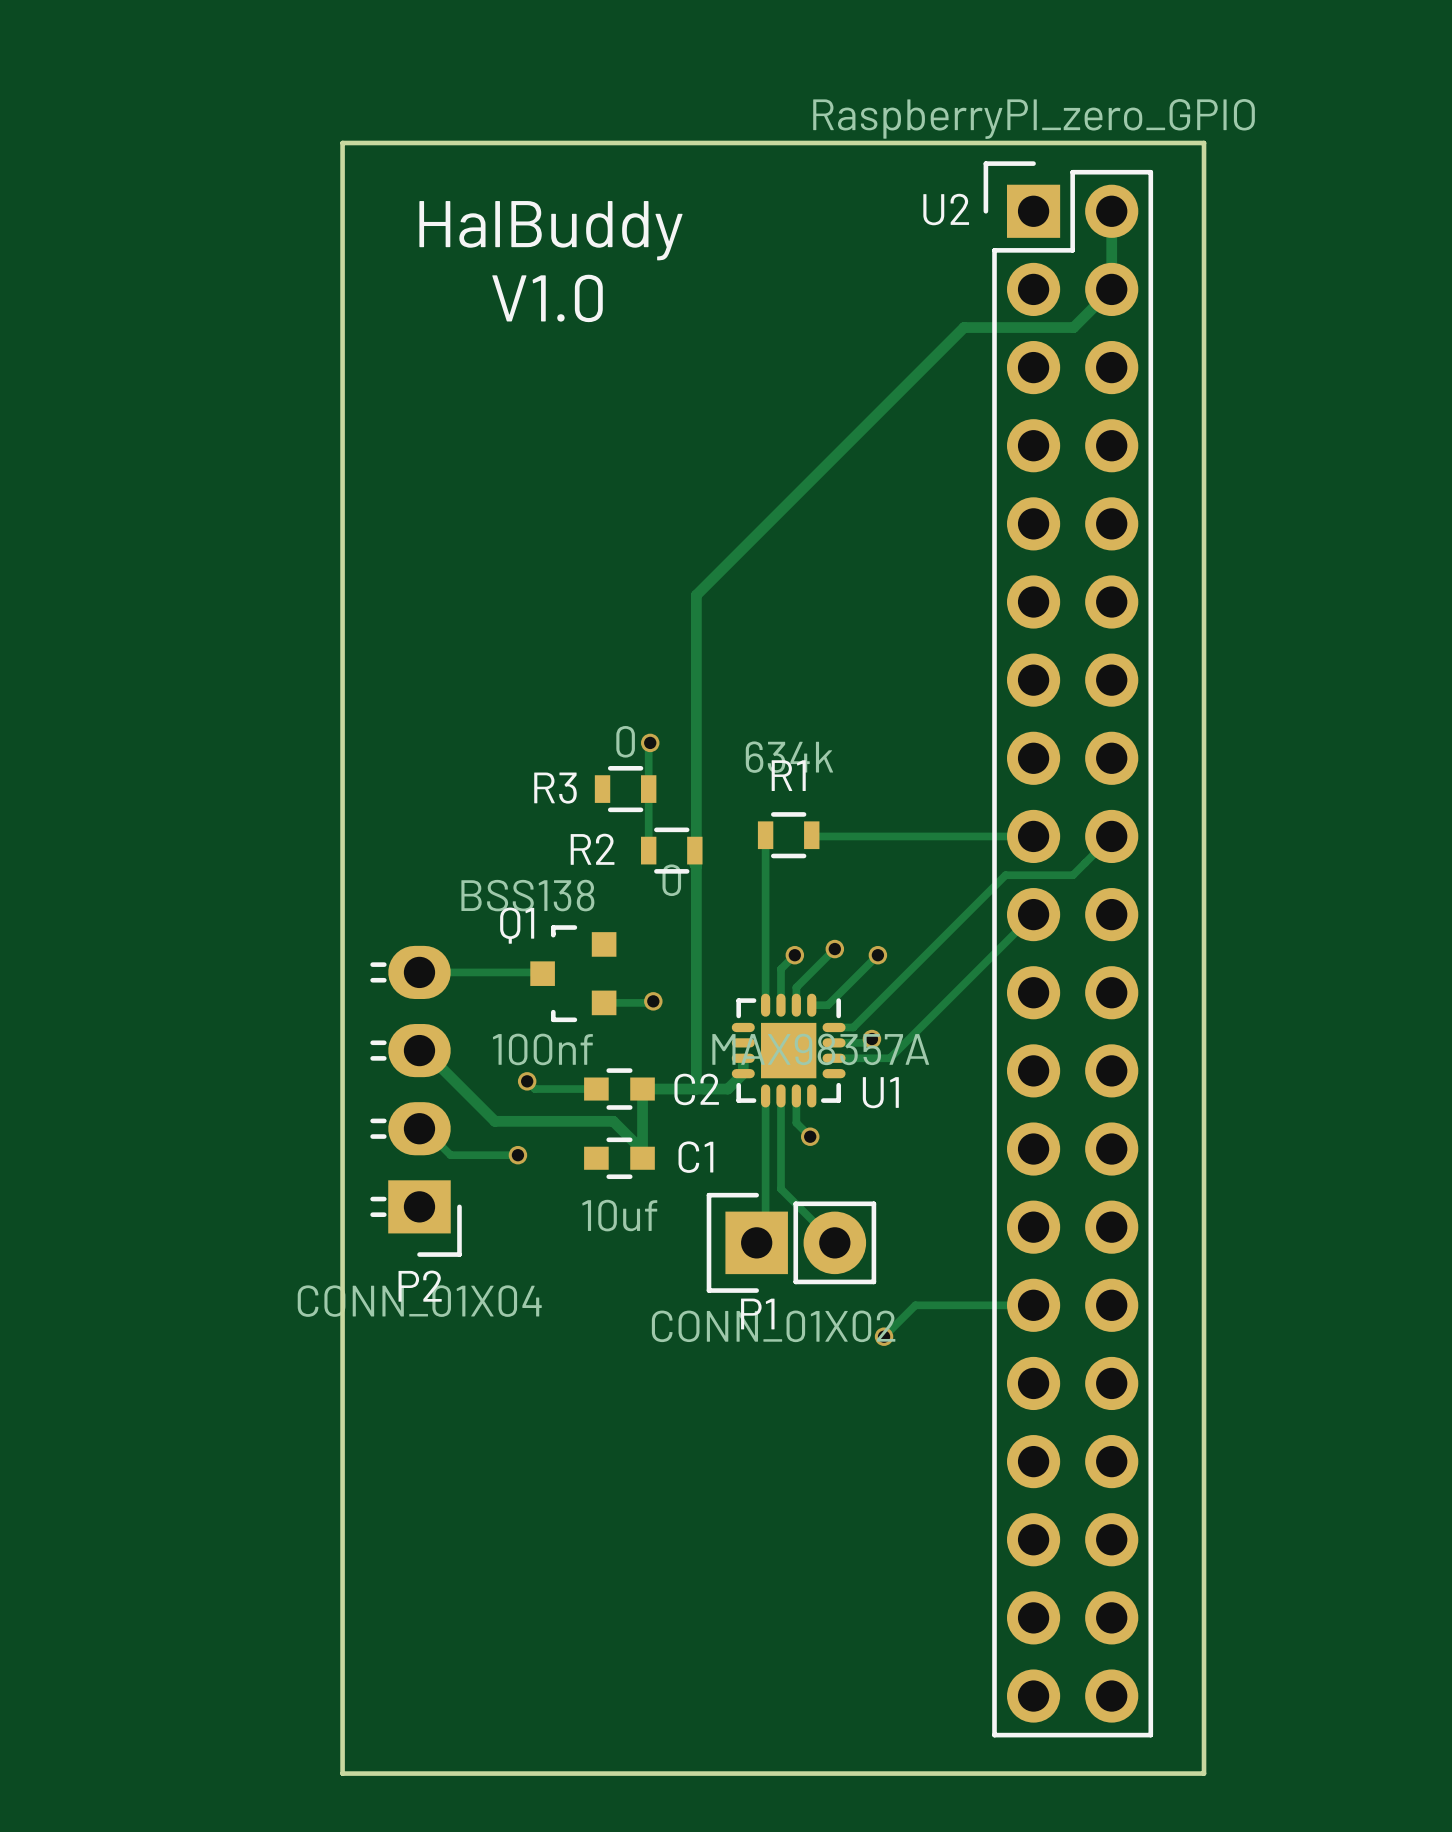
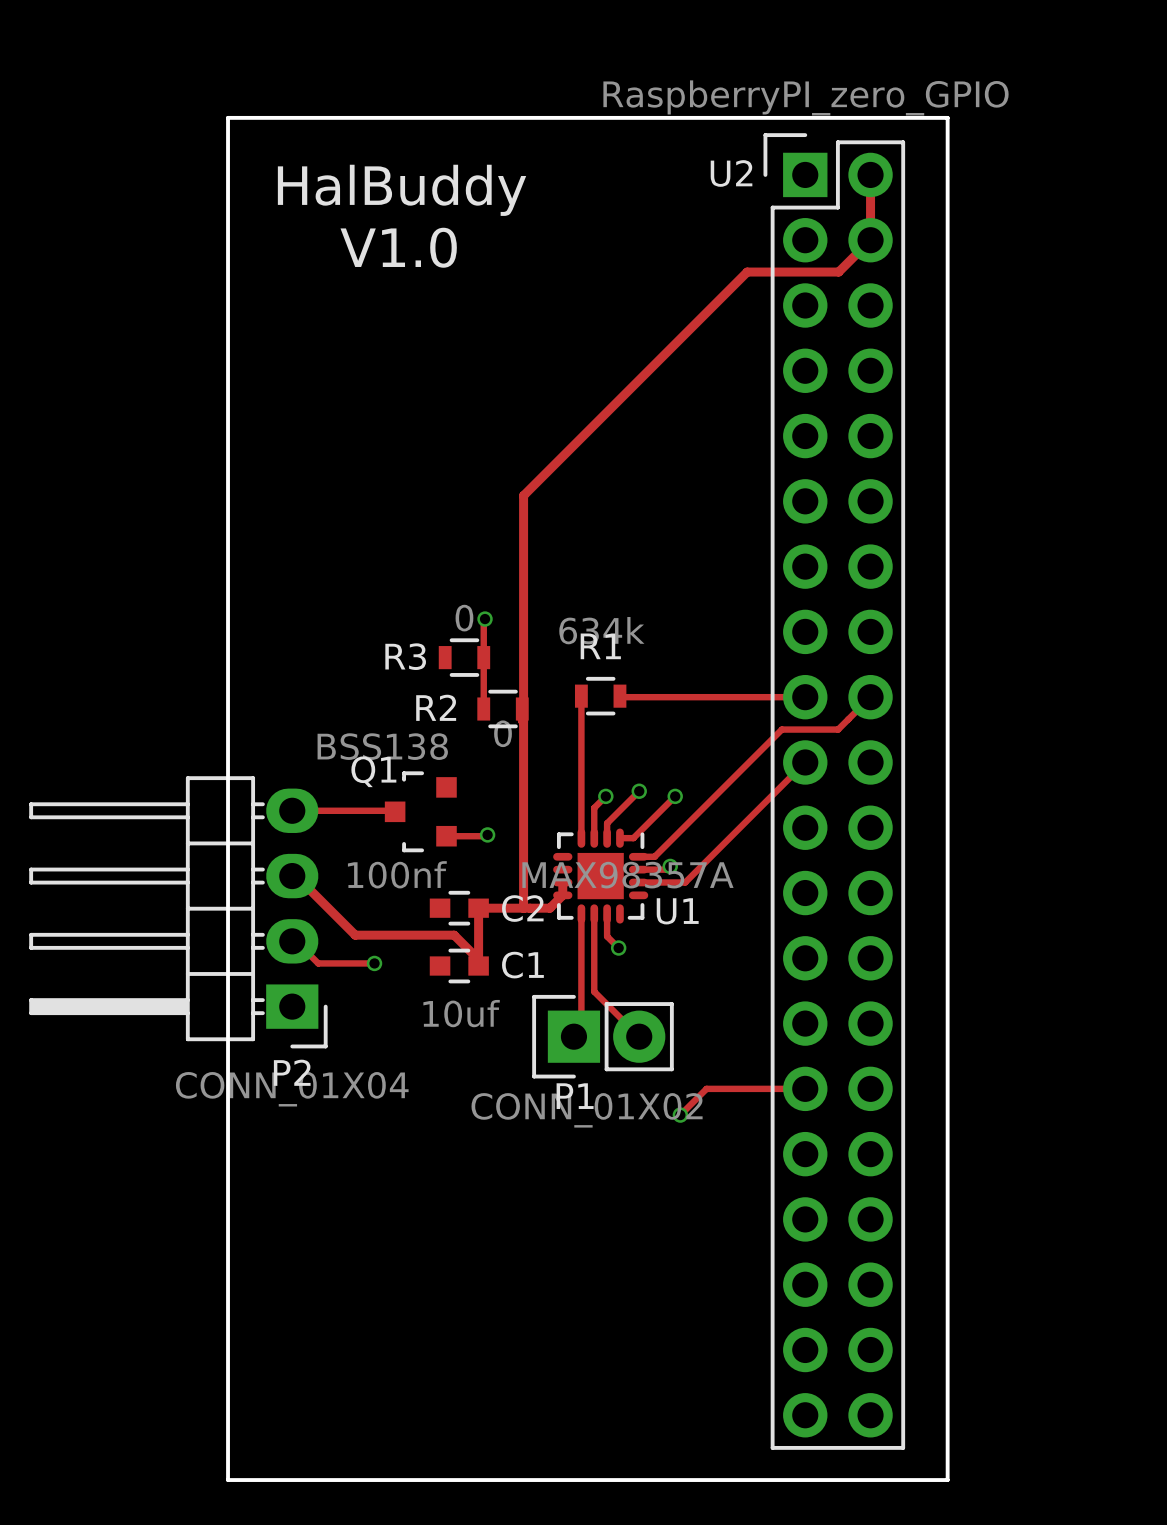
P2 footprint: [370, 945, 462, 1257] -> [29, 776, 328, 1049]
track: (527, 1081) (534, 1089) (596, 1089) -> none
via: (527, 1081) -> none

